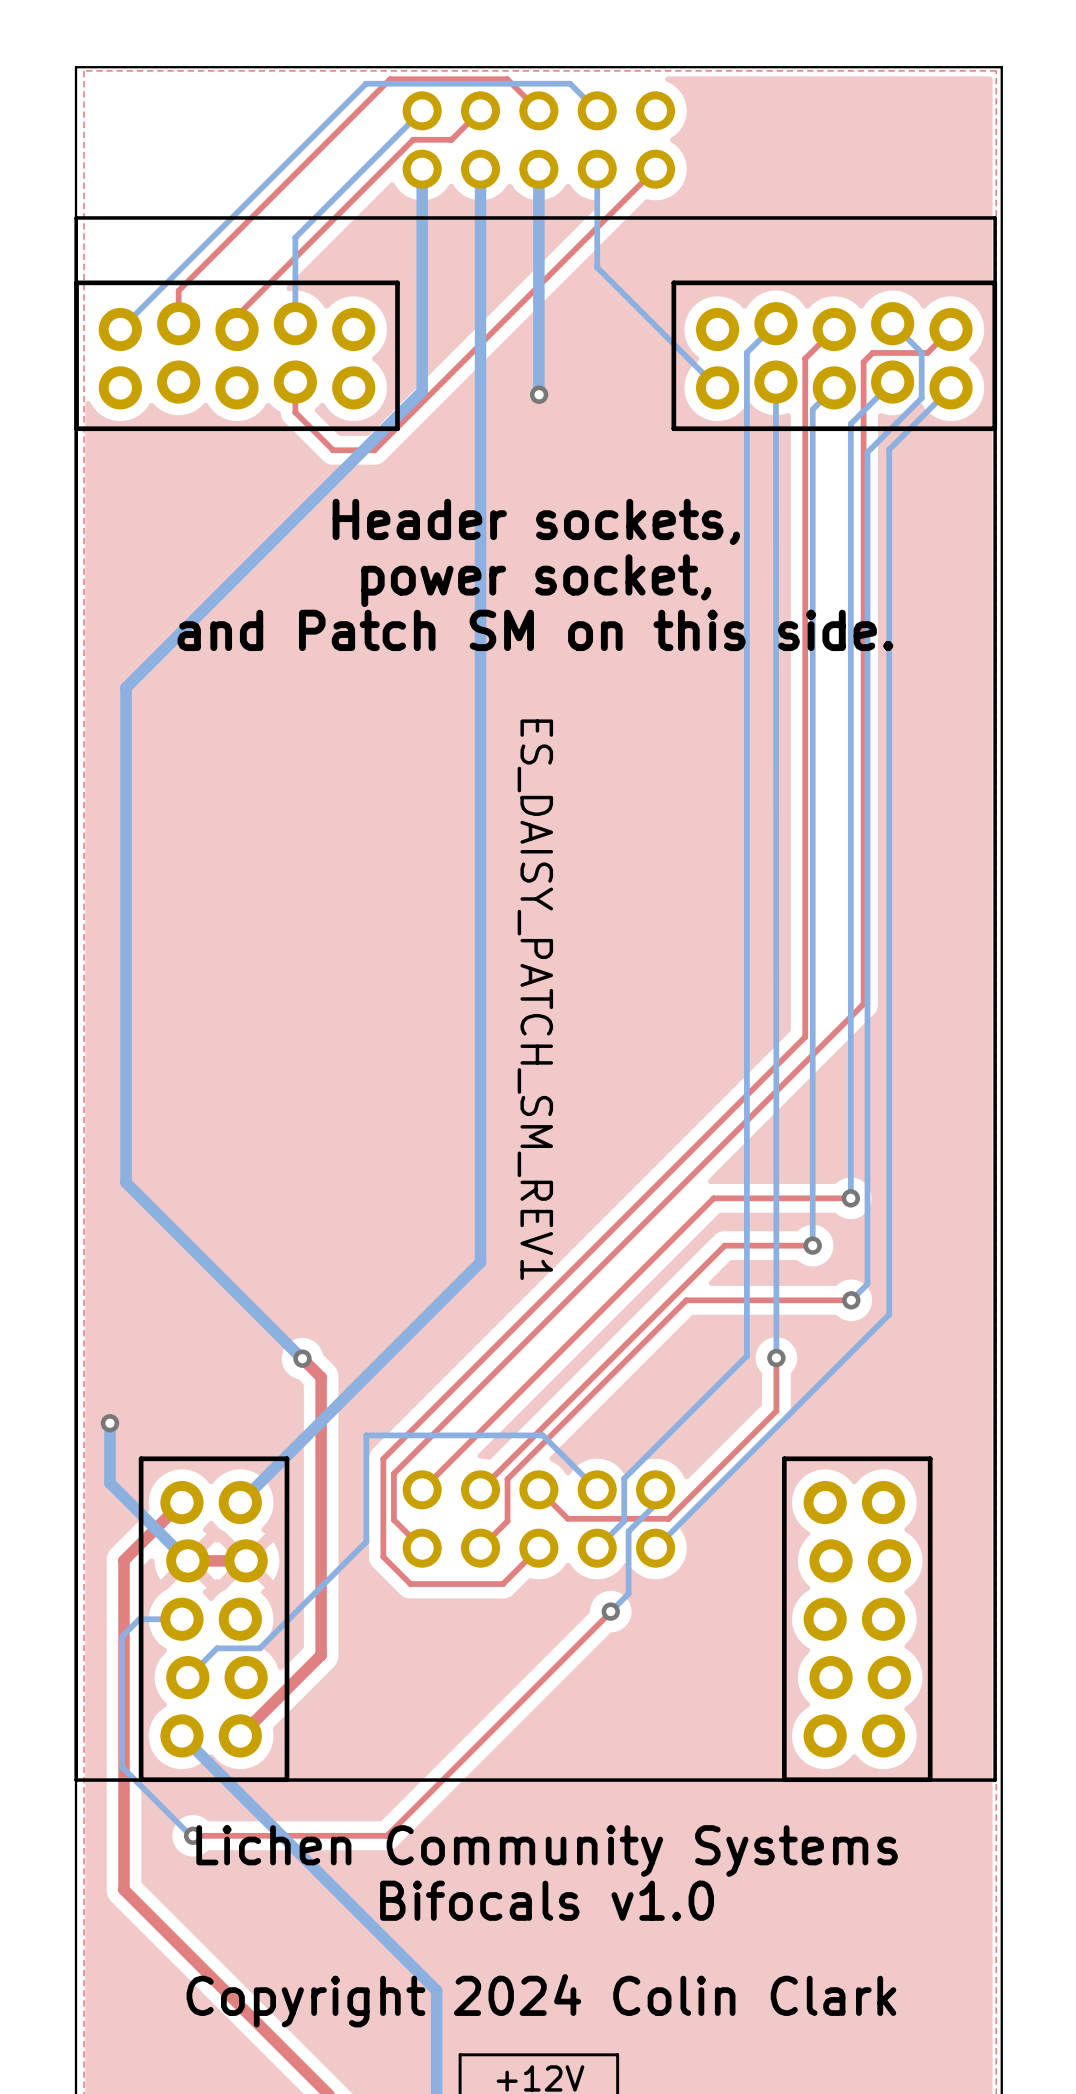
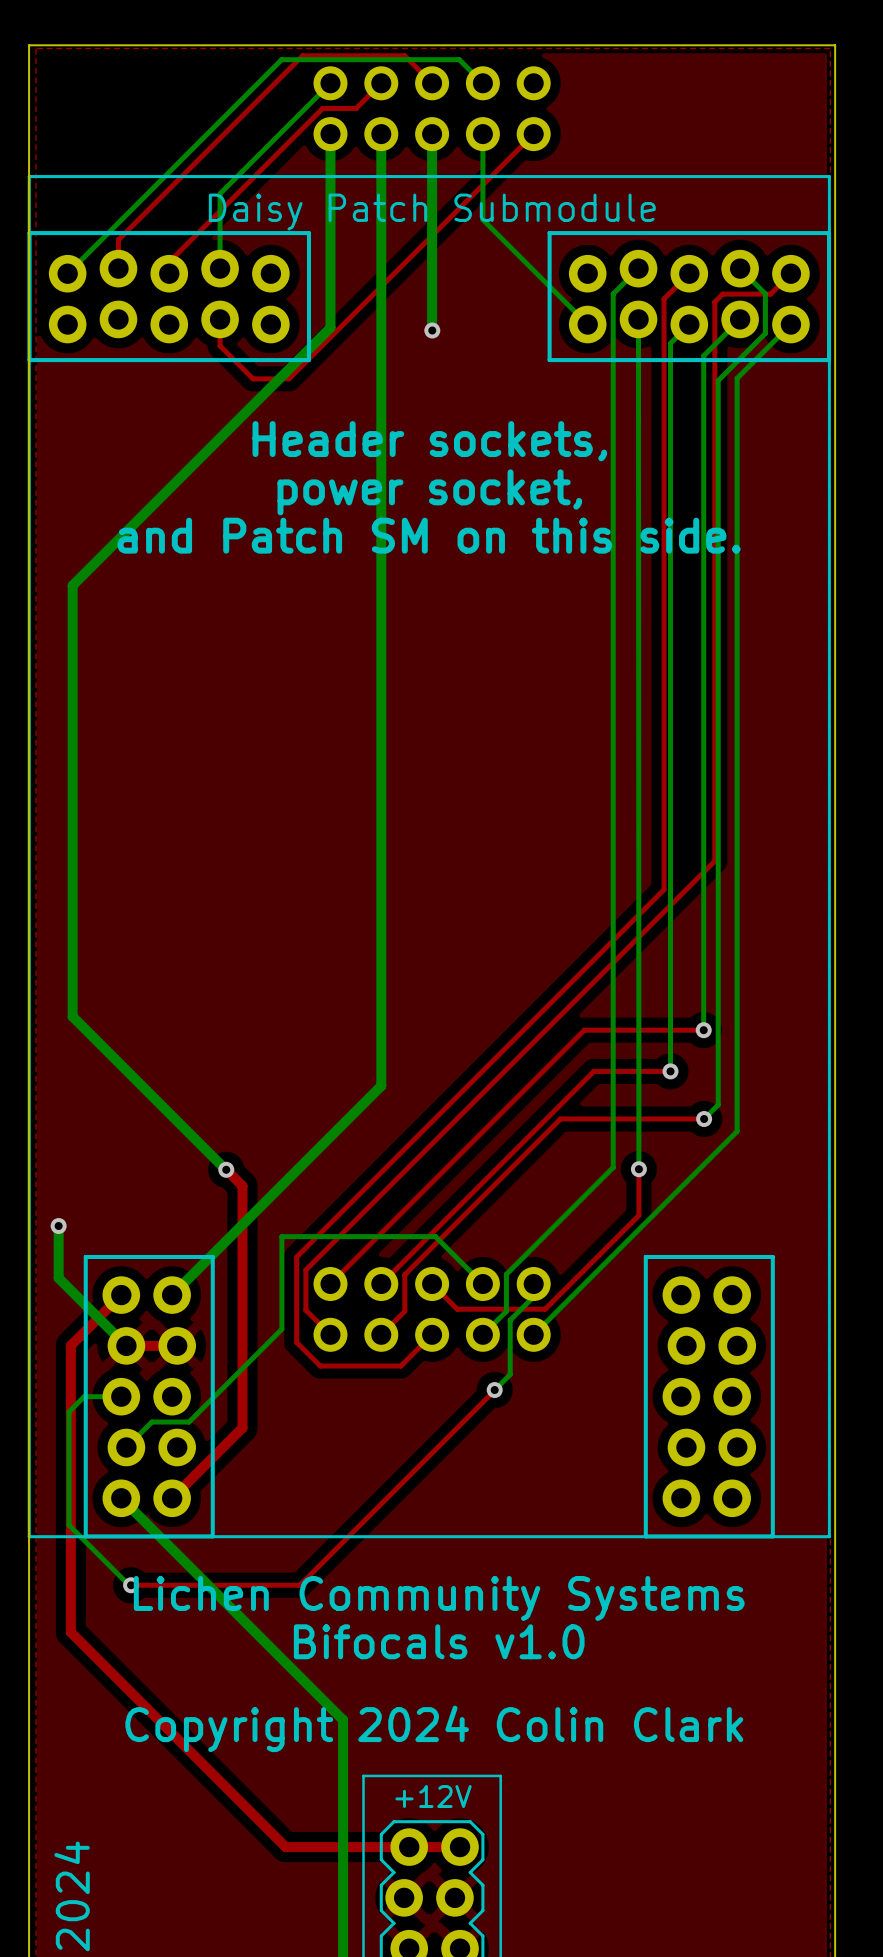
part value: ES_DAISY_PATCH_SM_REV1 (535, 999) -> Daisy Patch Submodule (432, 211)

